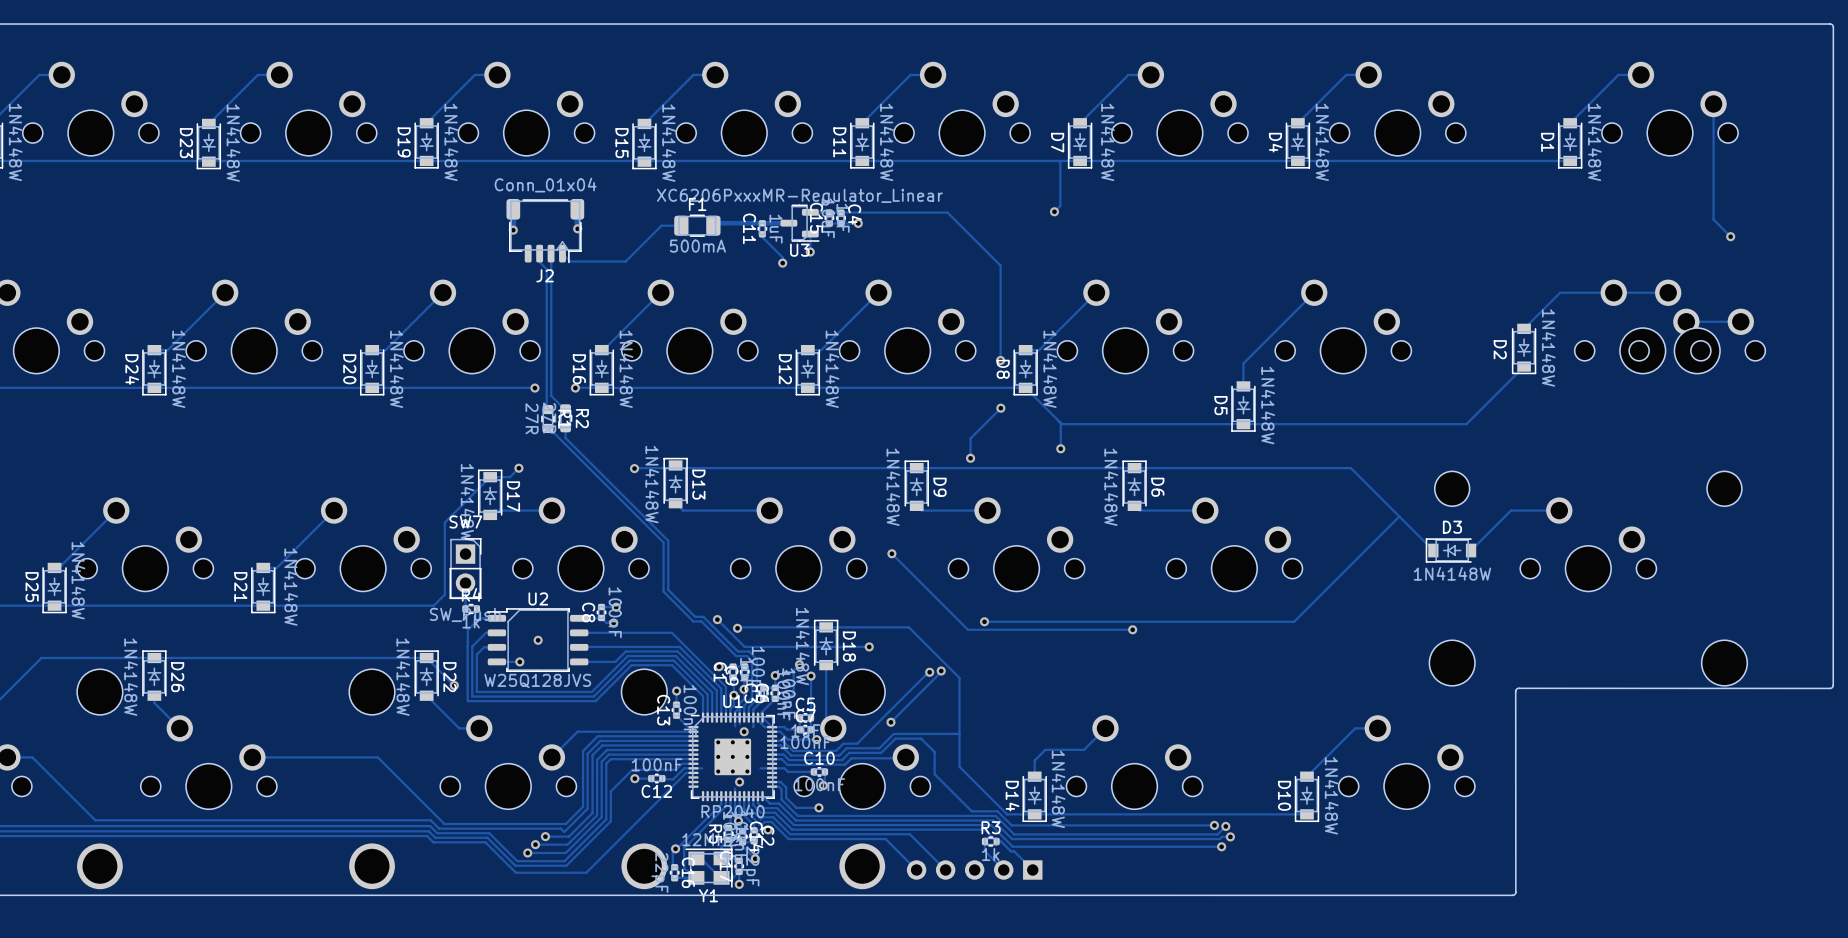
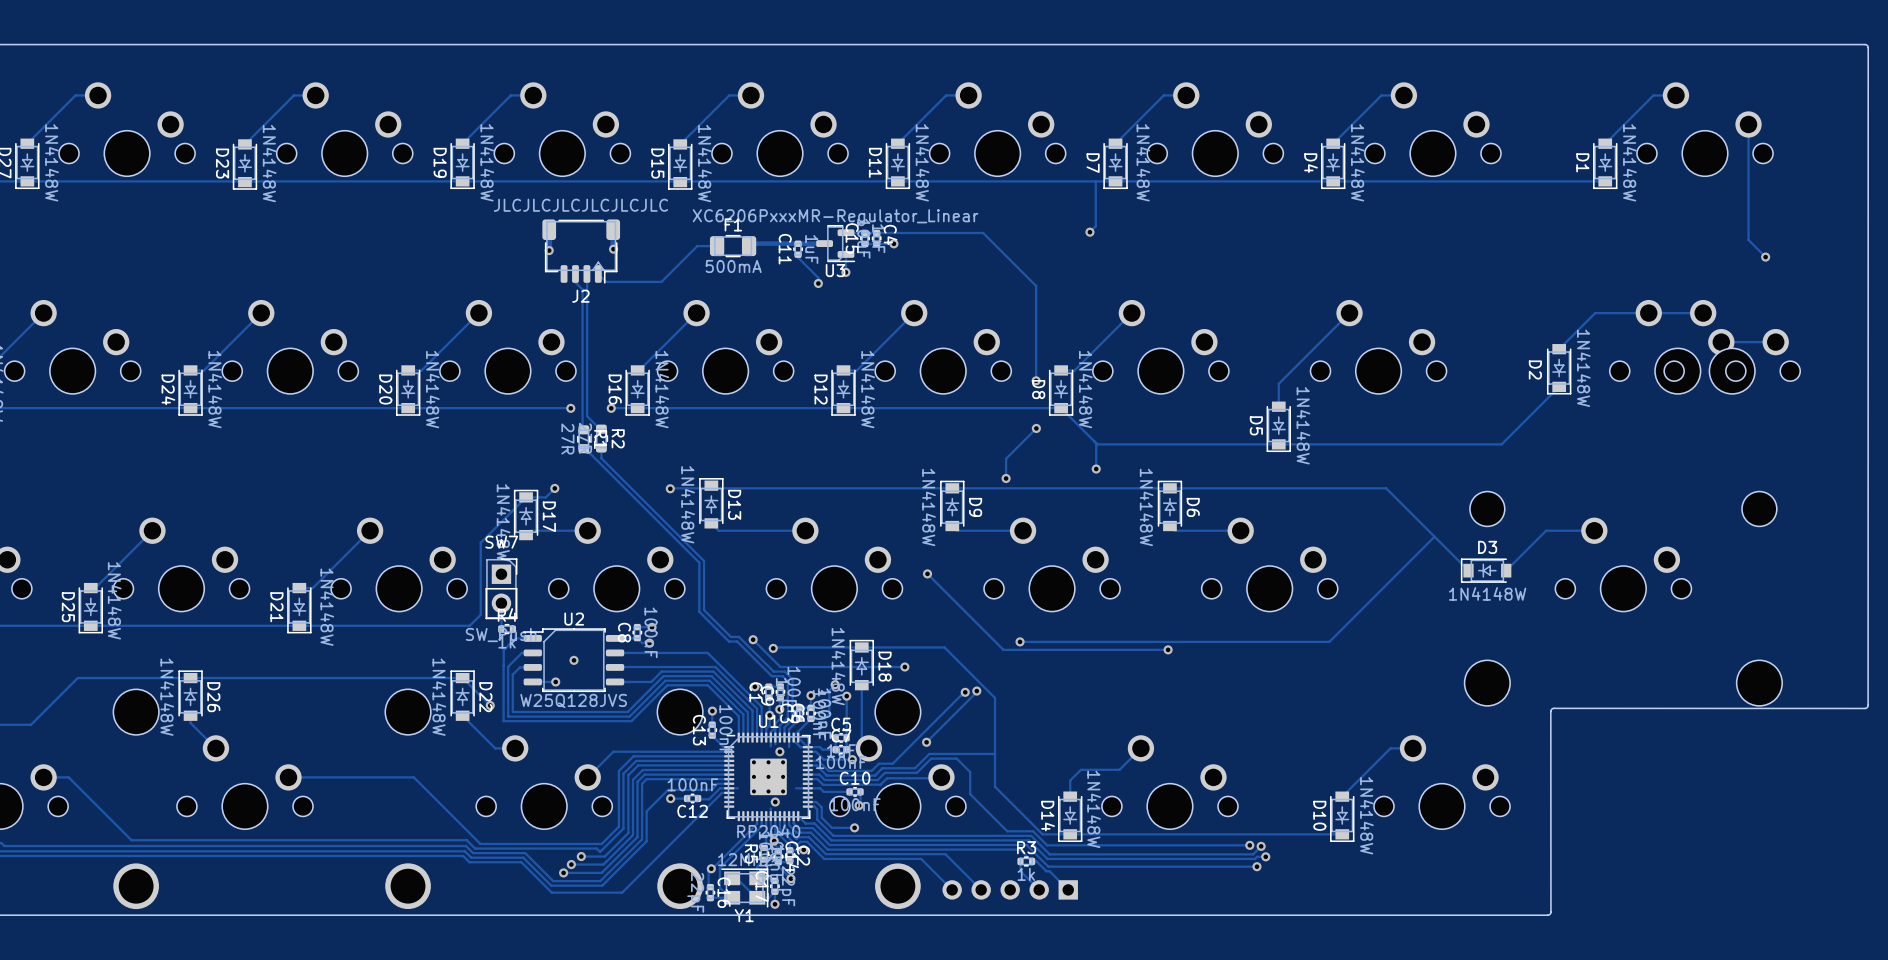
J2 value: Conn_01x04 (545, 185) -> JLCJLCJLCJLCJLCJLC (580, 205)

